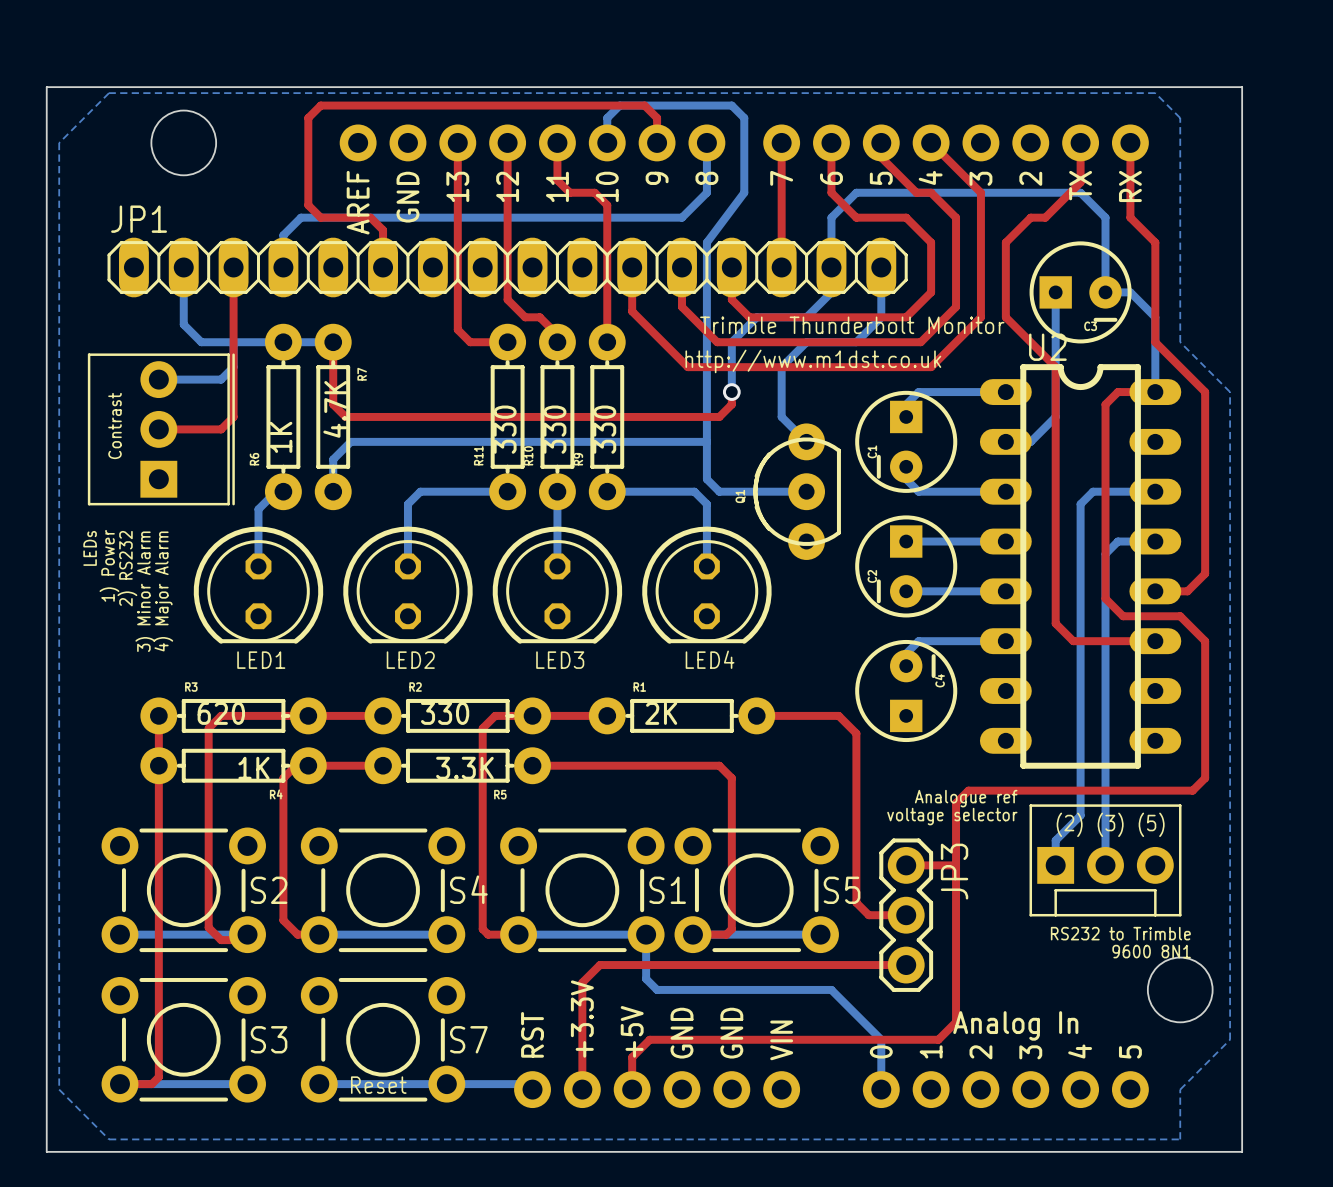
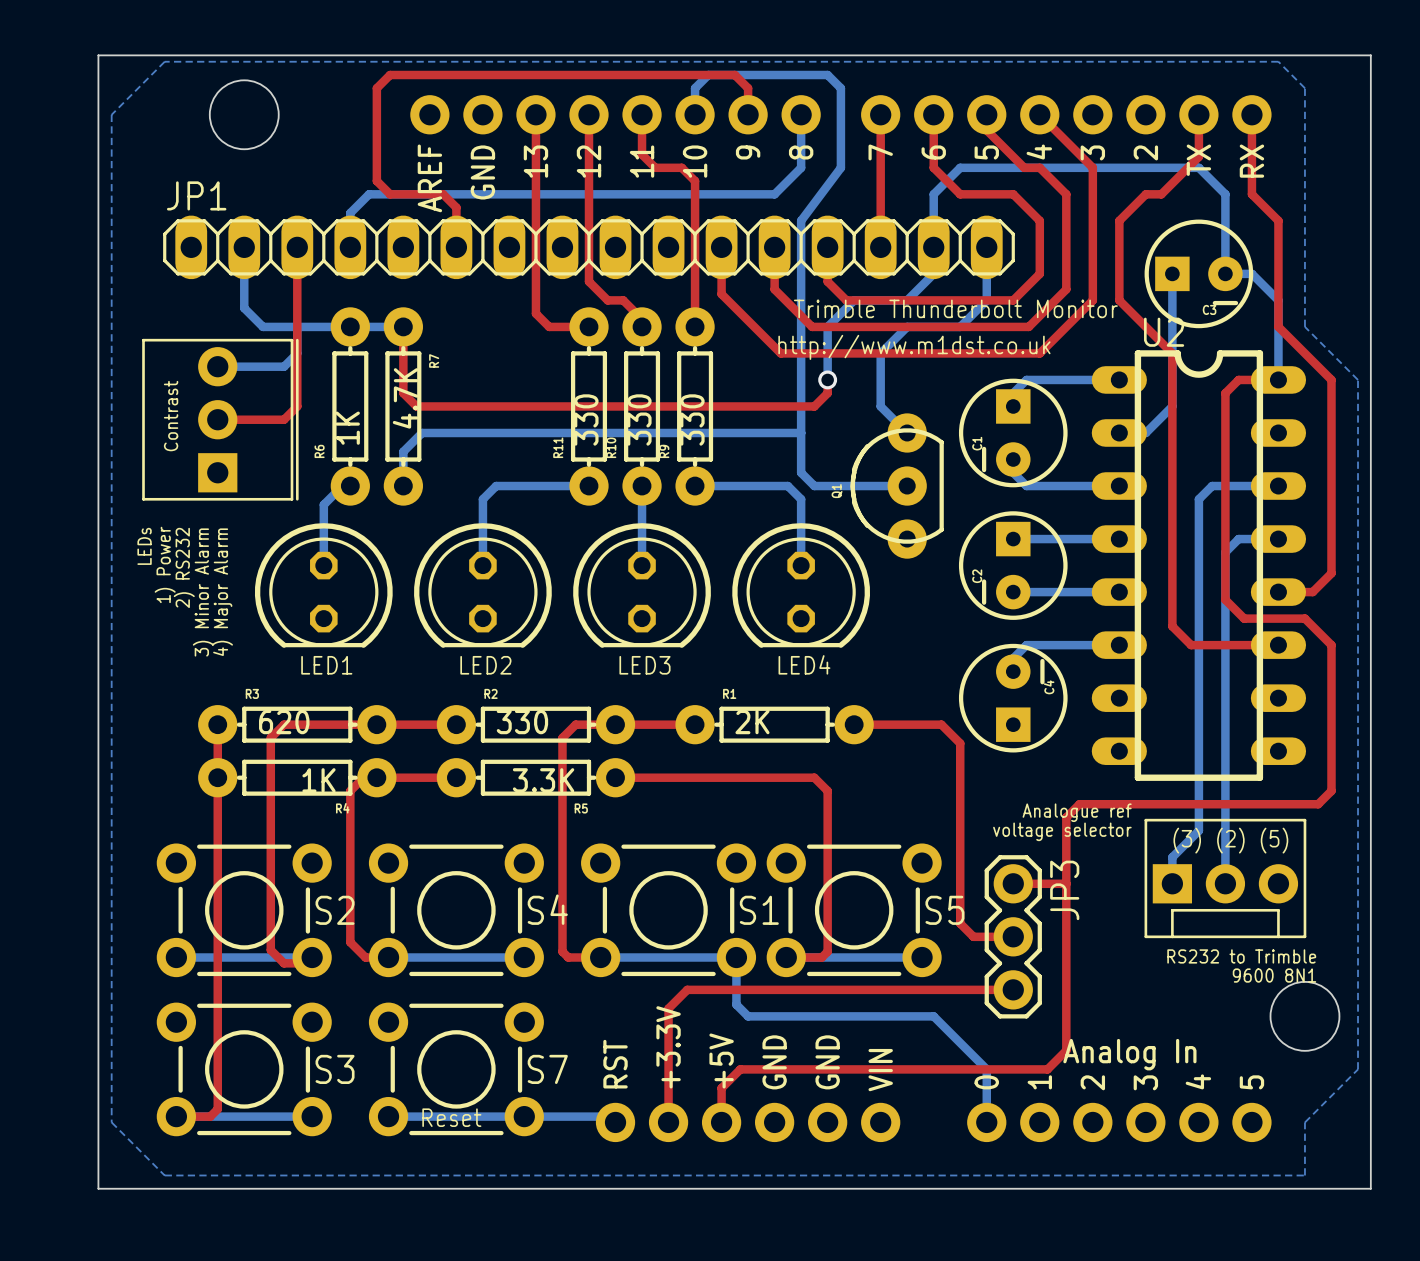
text: (2) (3) (5) (1110, 824) -> (3) (2) (5) (1230, 840)

